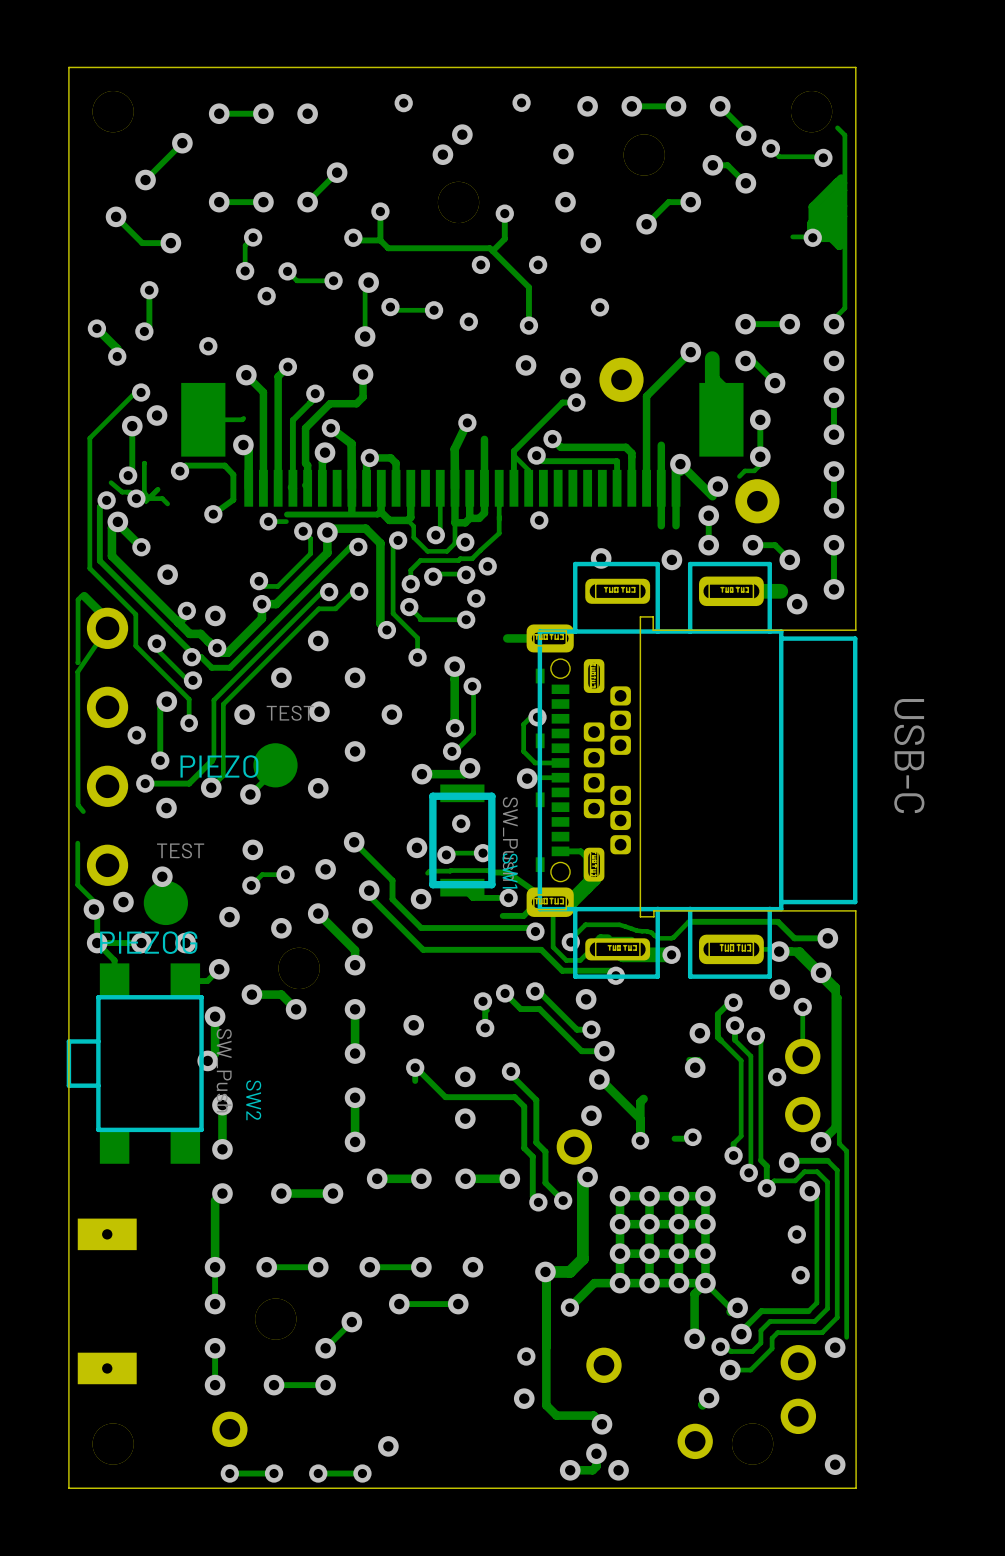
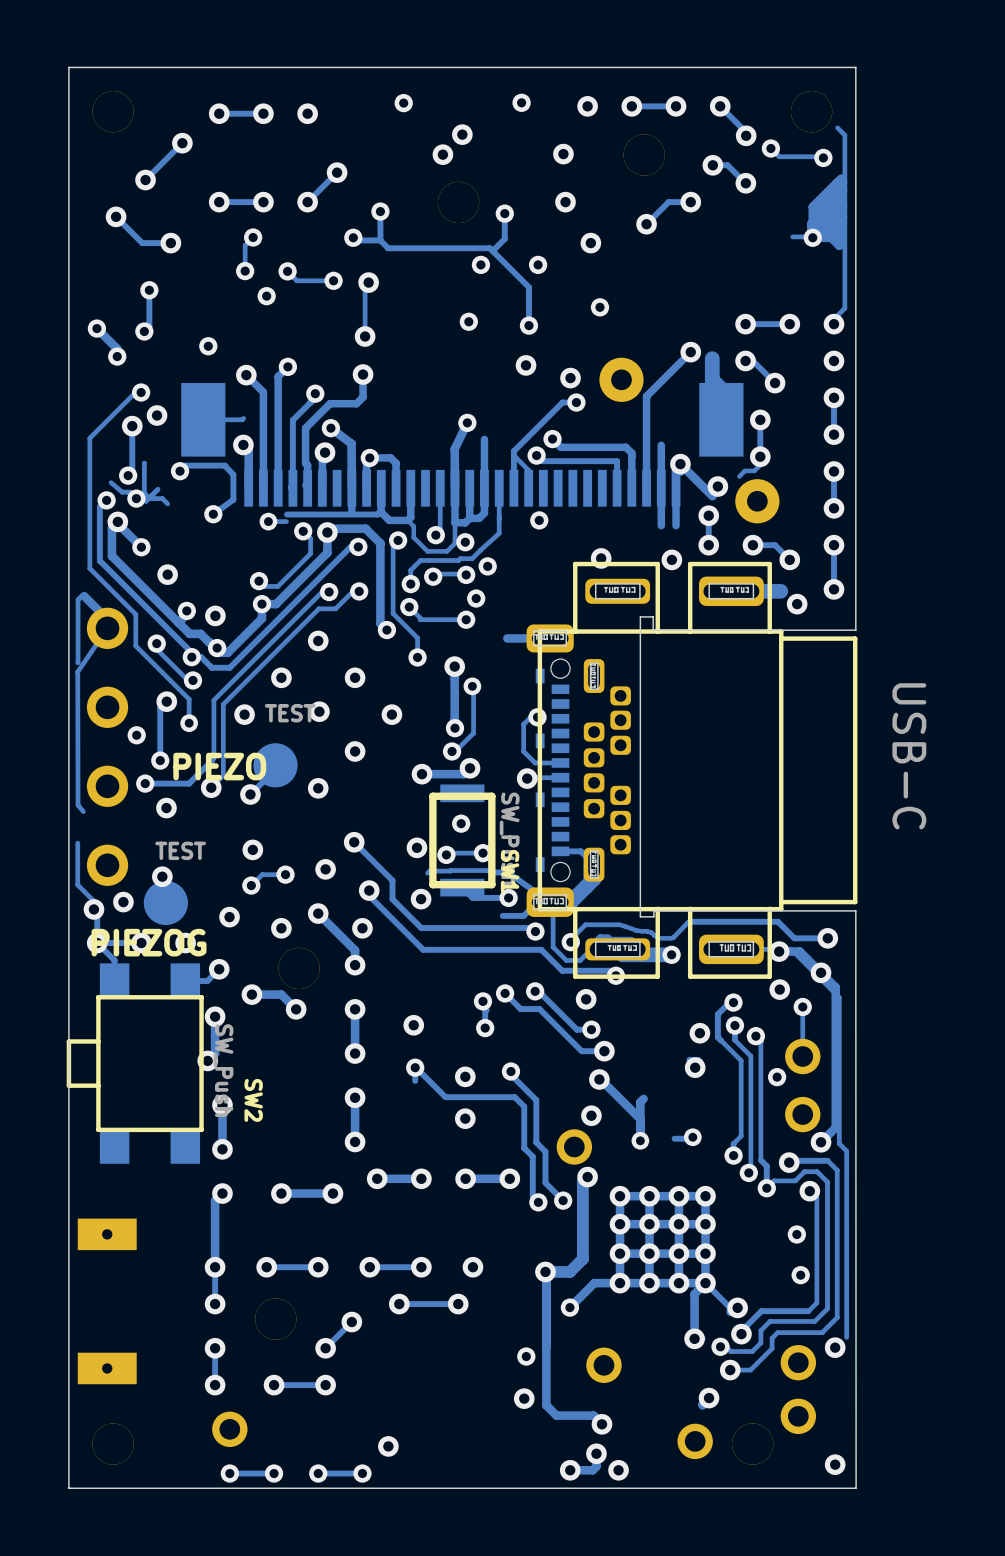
track: (390, 307) (393, 310) (434, 310) -> none
via: (390, 307) -> none
via: (434, 310) -> none

